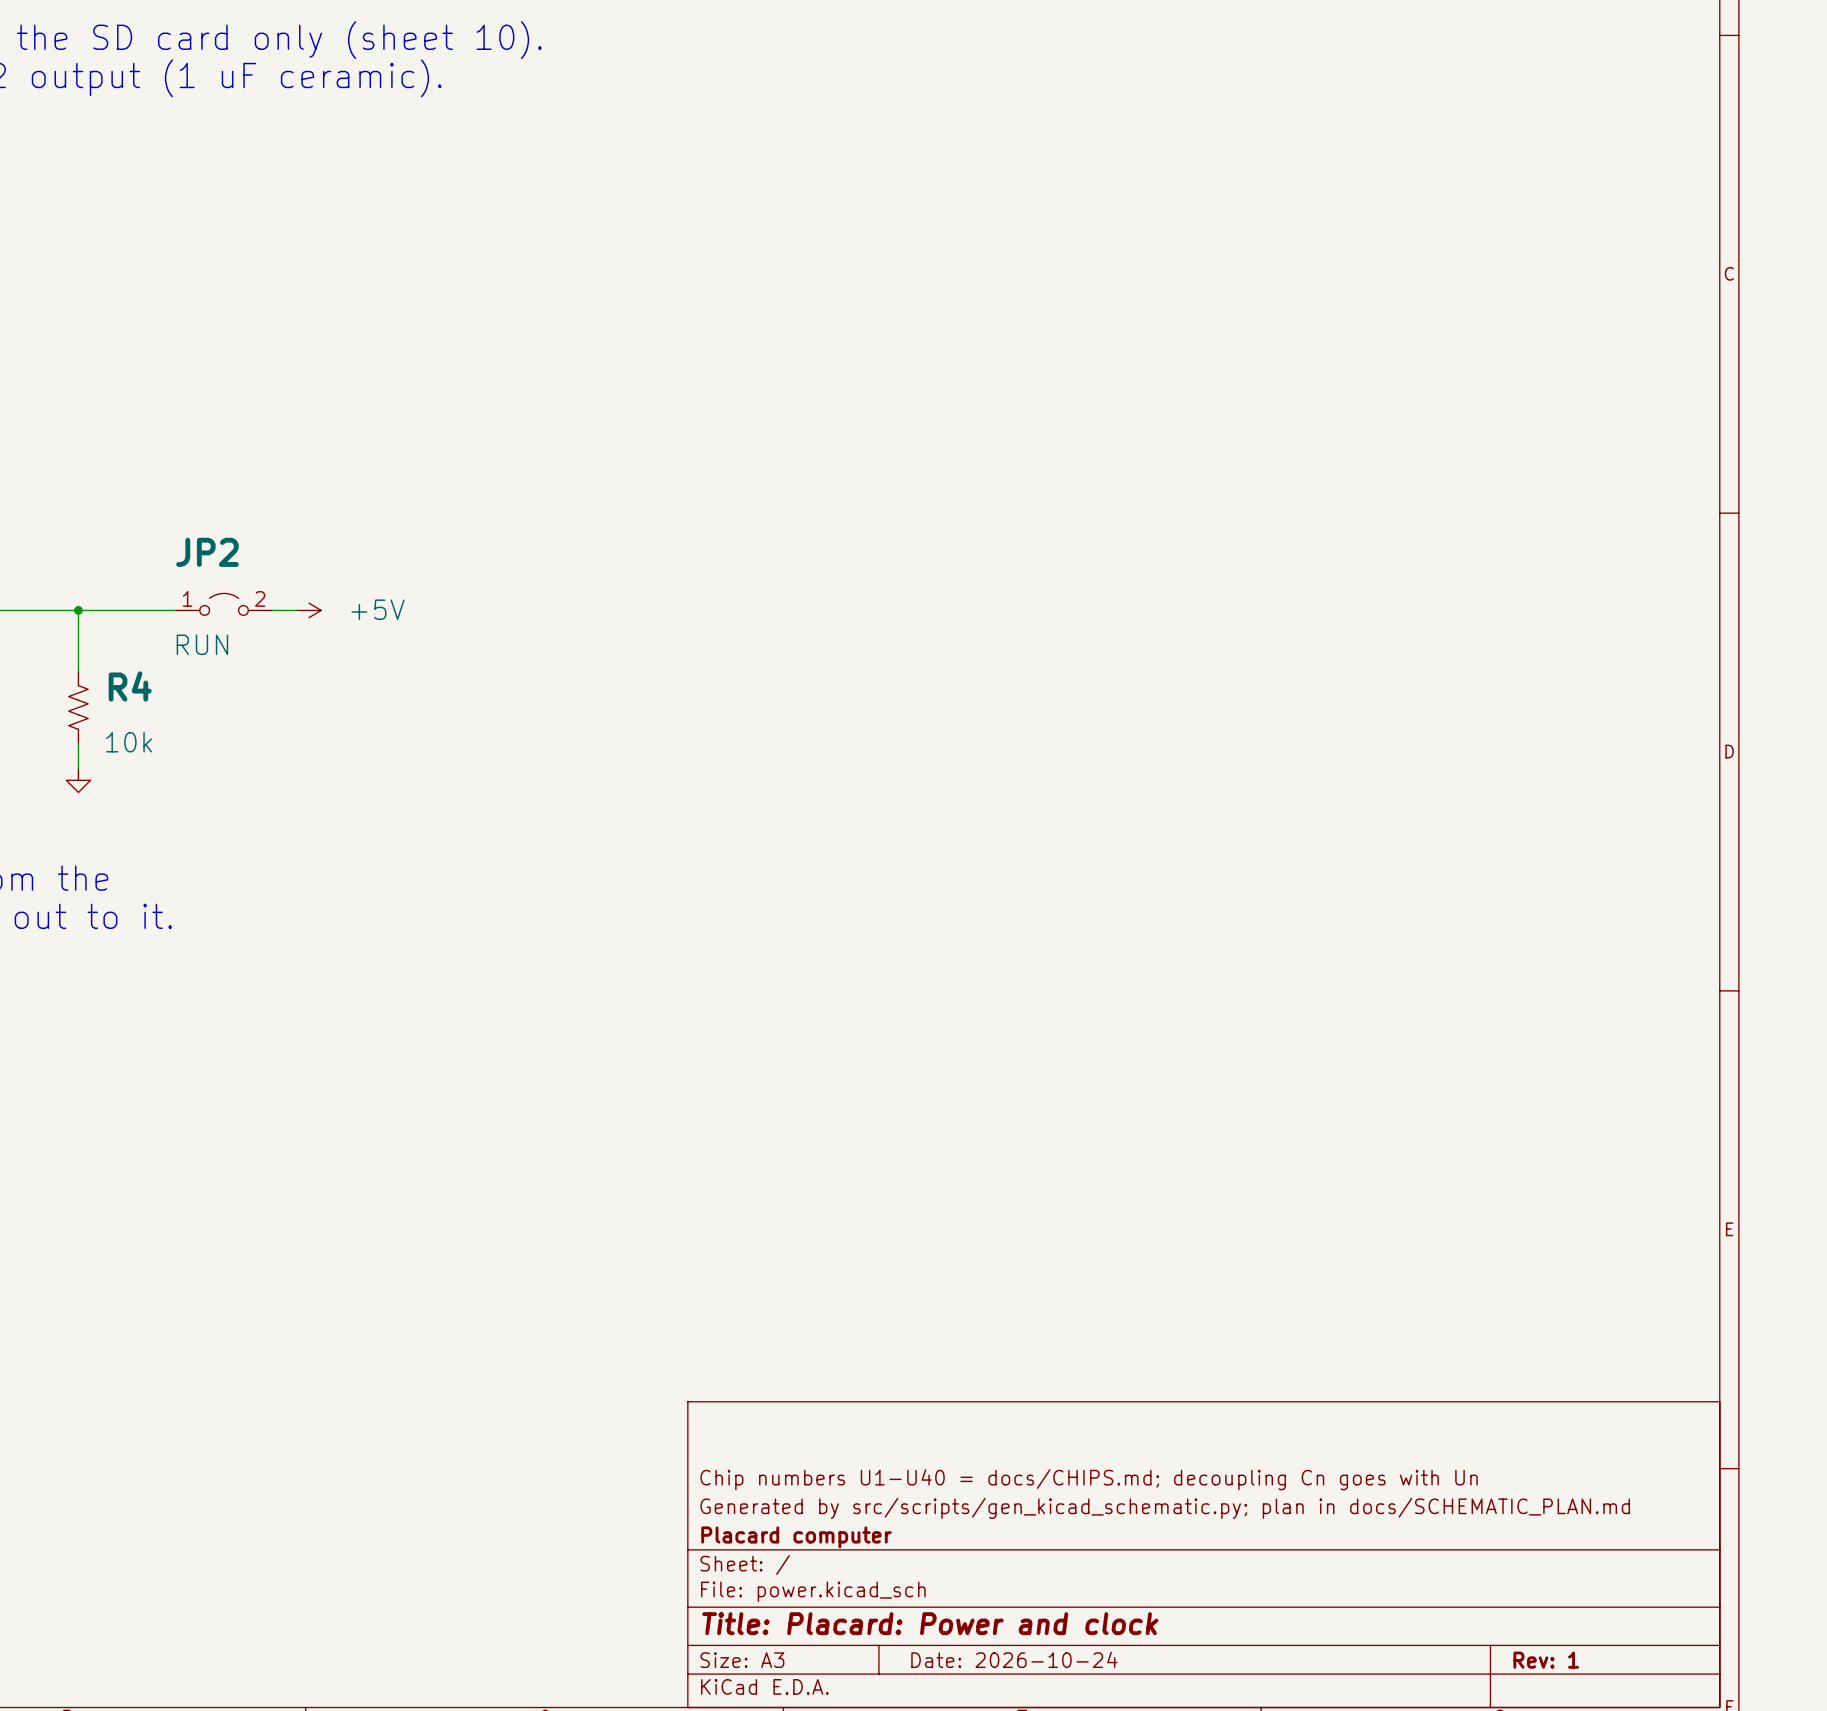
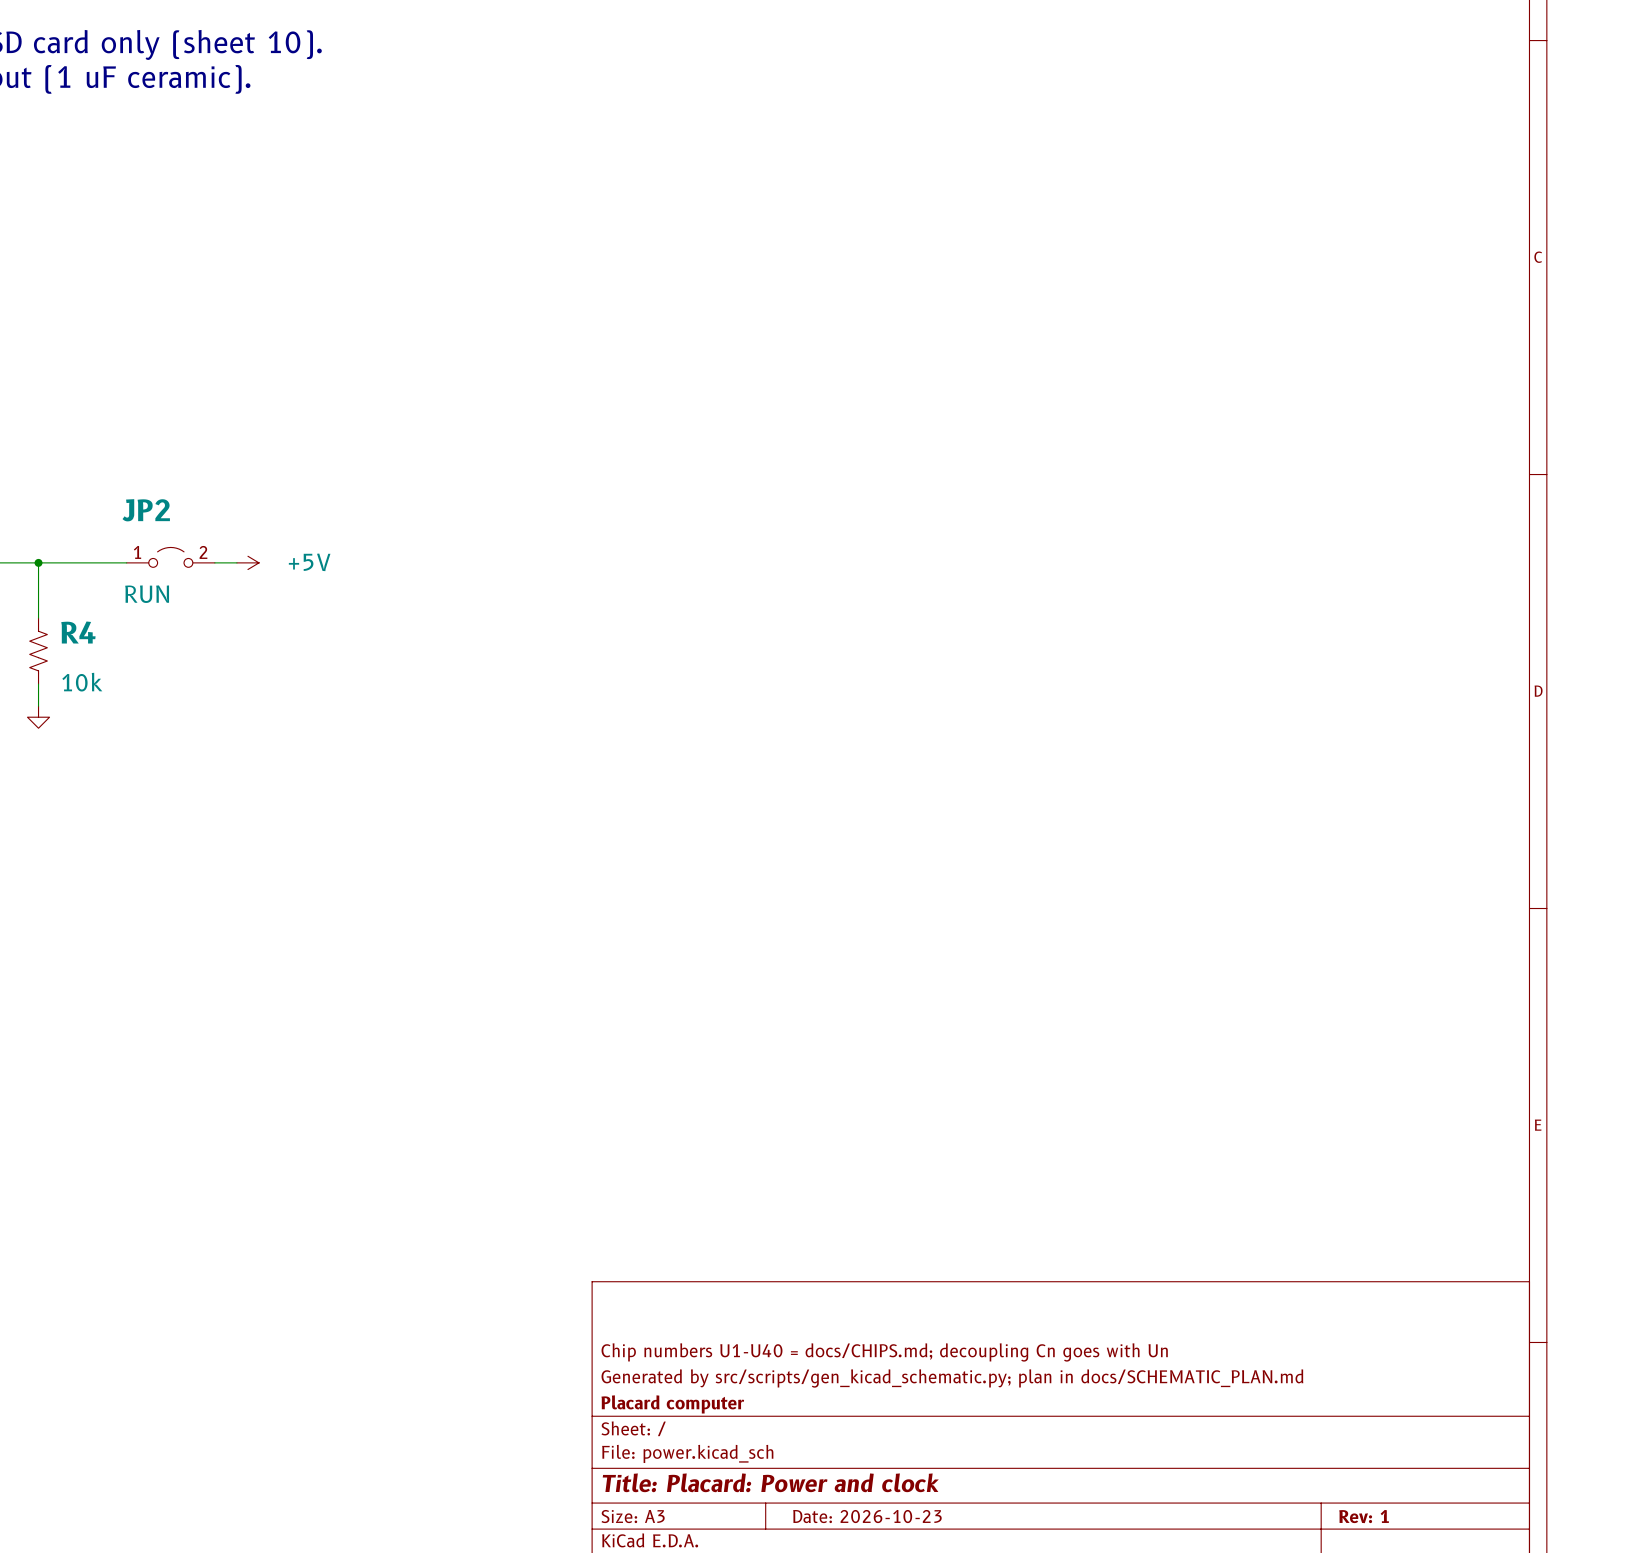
title block: Date: 2026-10-24 (1014, 1659) -> Date: 2026-10-23 (867, 1516)

